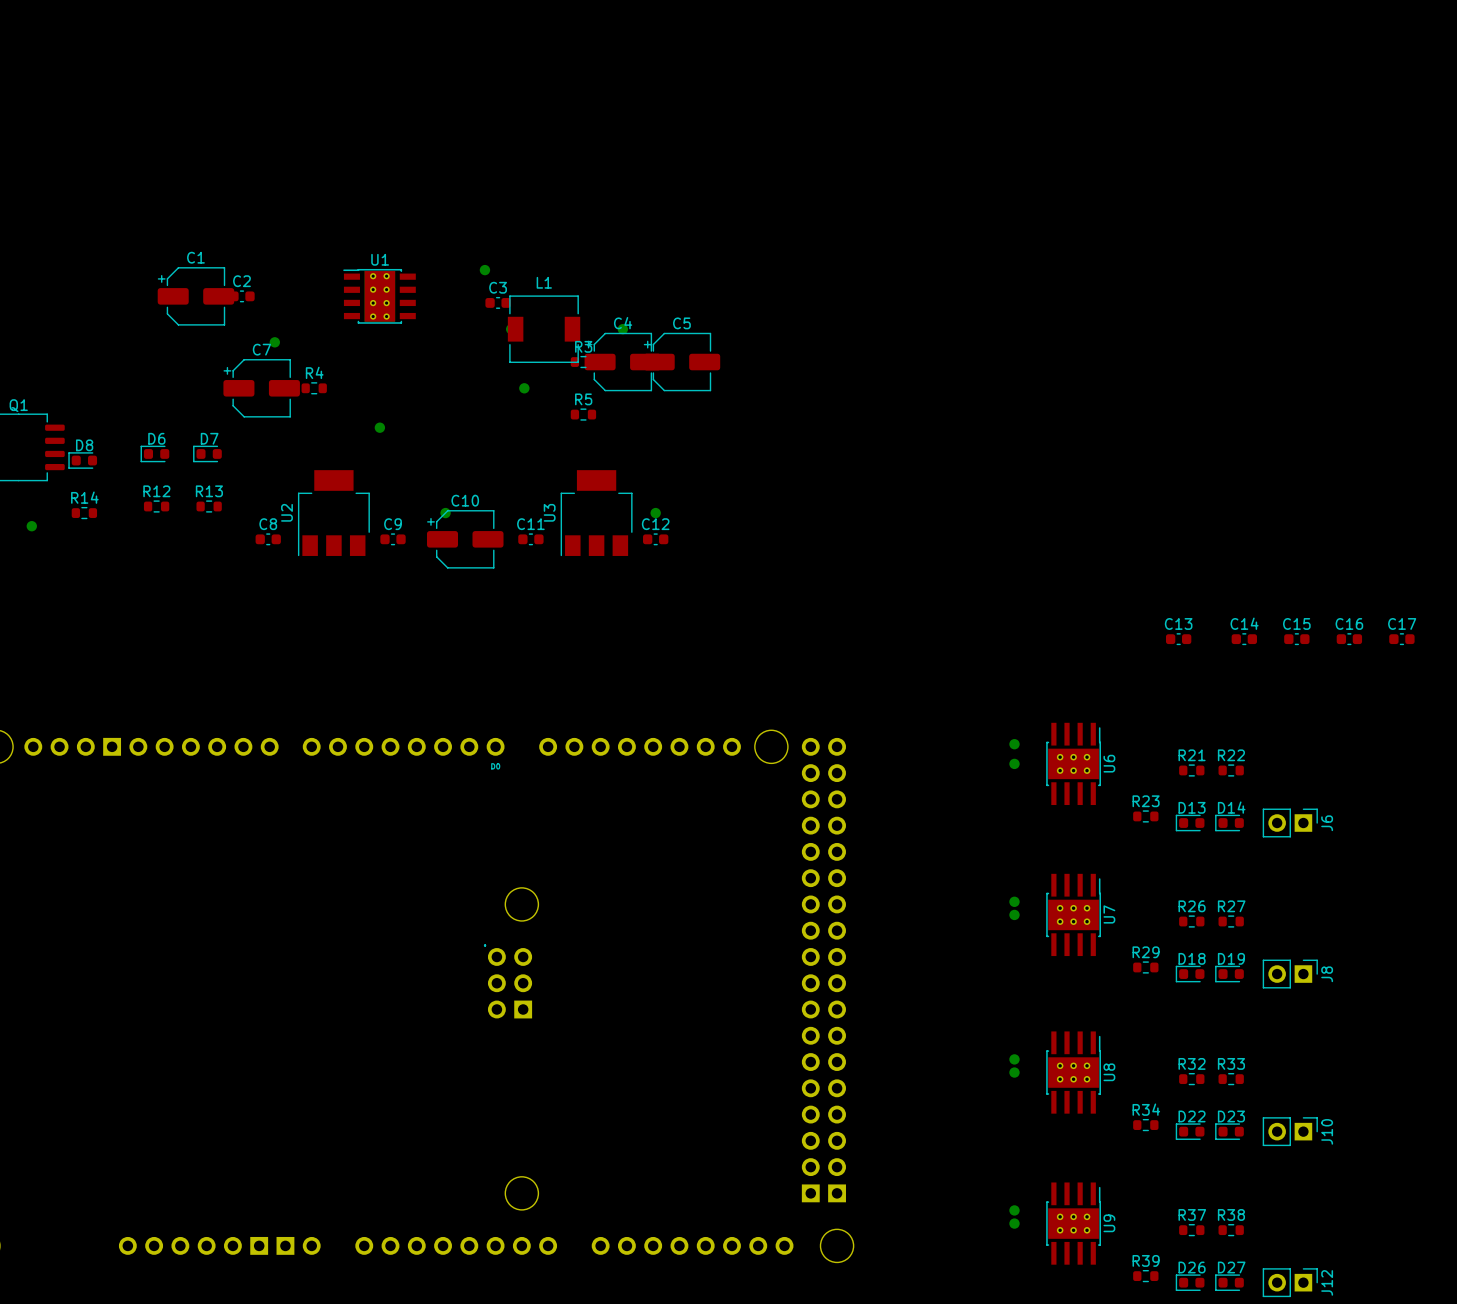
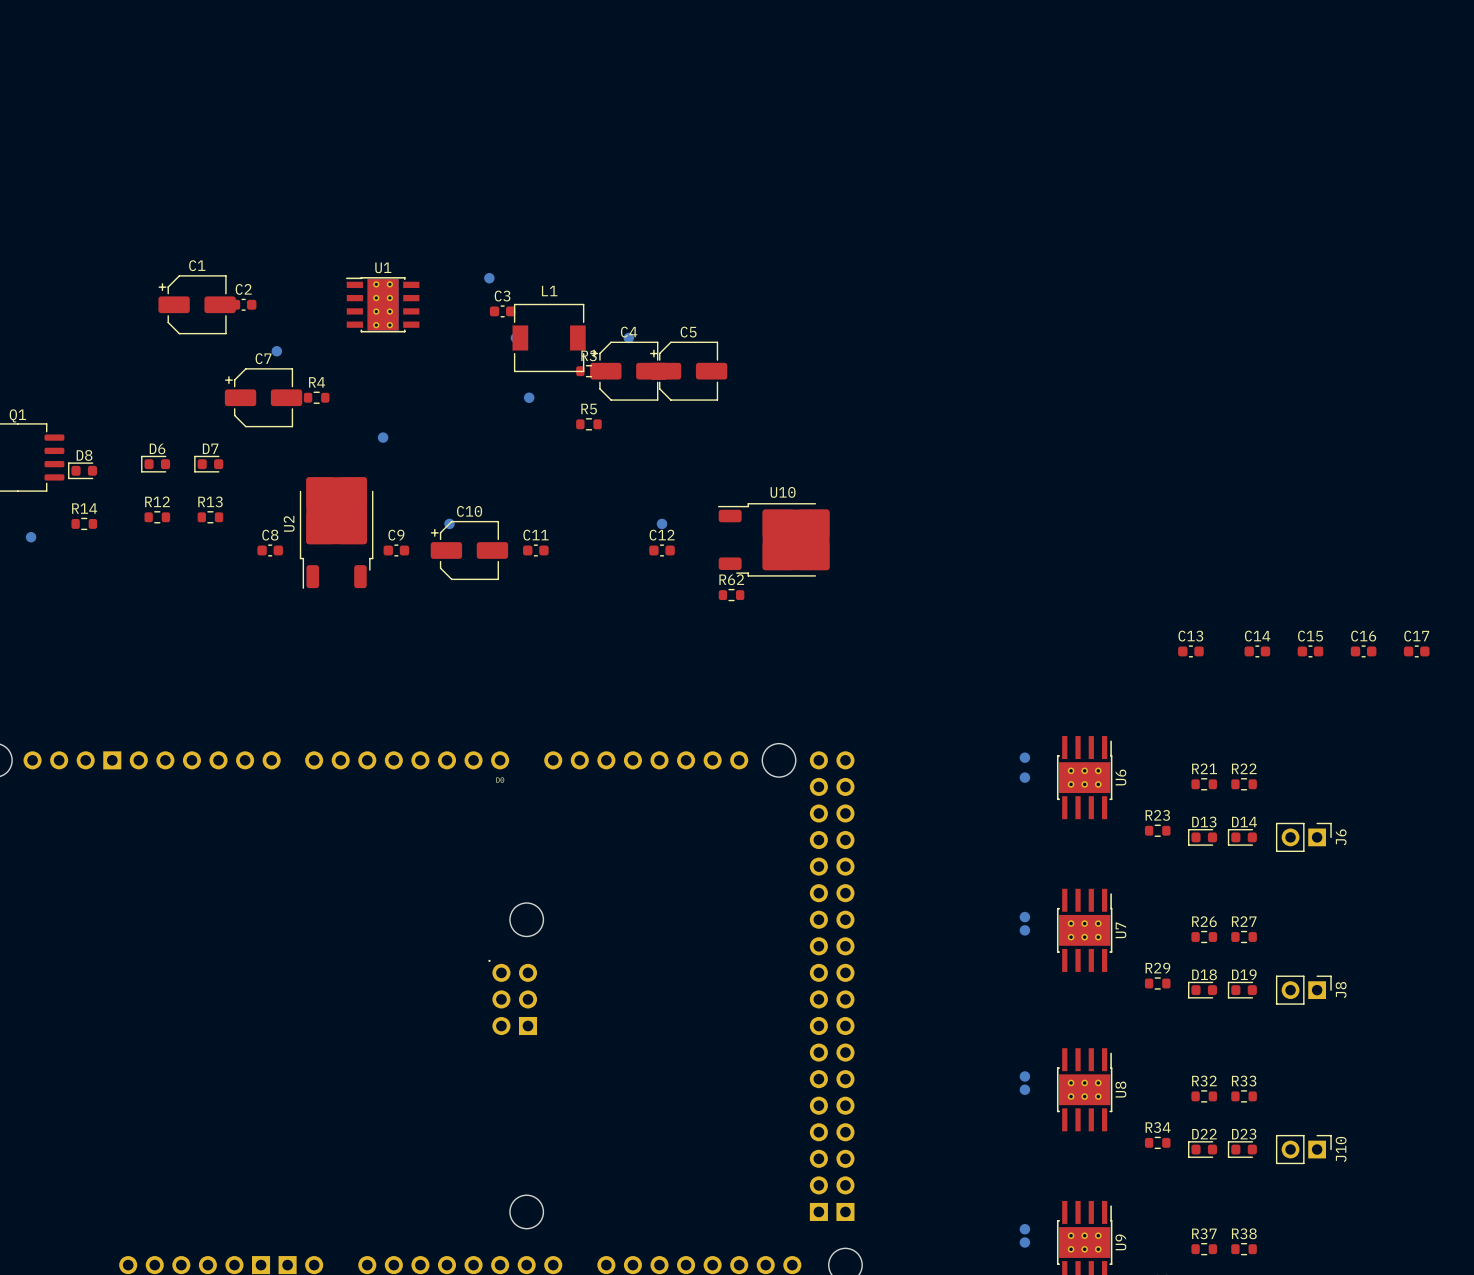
U2 footprint: [298, 470, 370, 557] -> [299, 477, 374, 589]
U3: (596, 513) -> none
U10: none -> (773, 539)
R62: none -> (731, 595)

